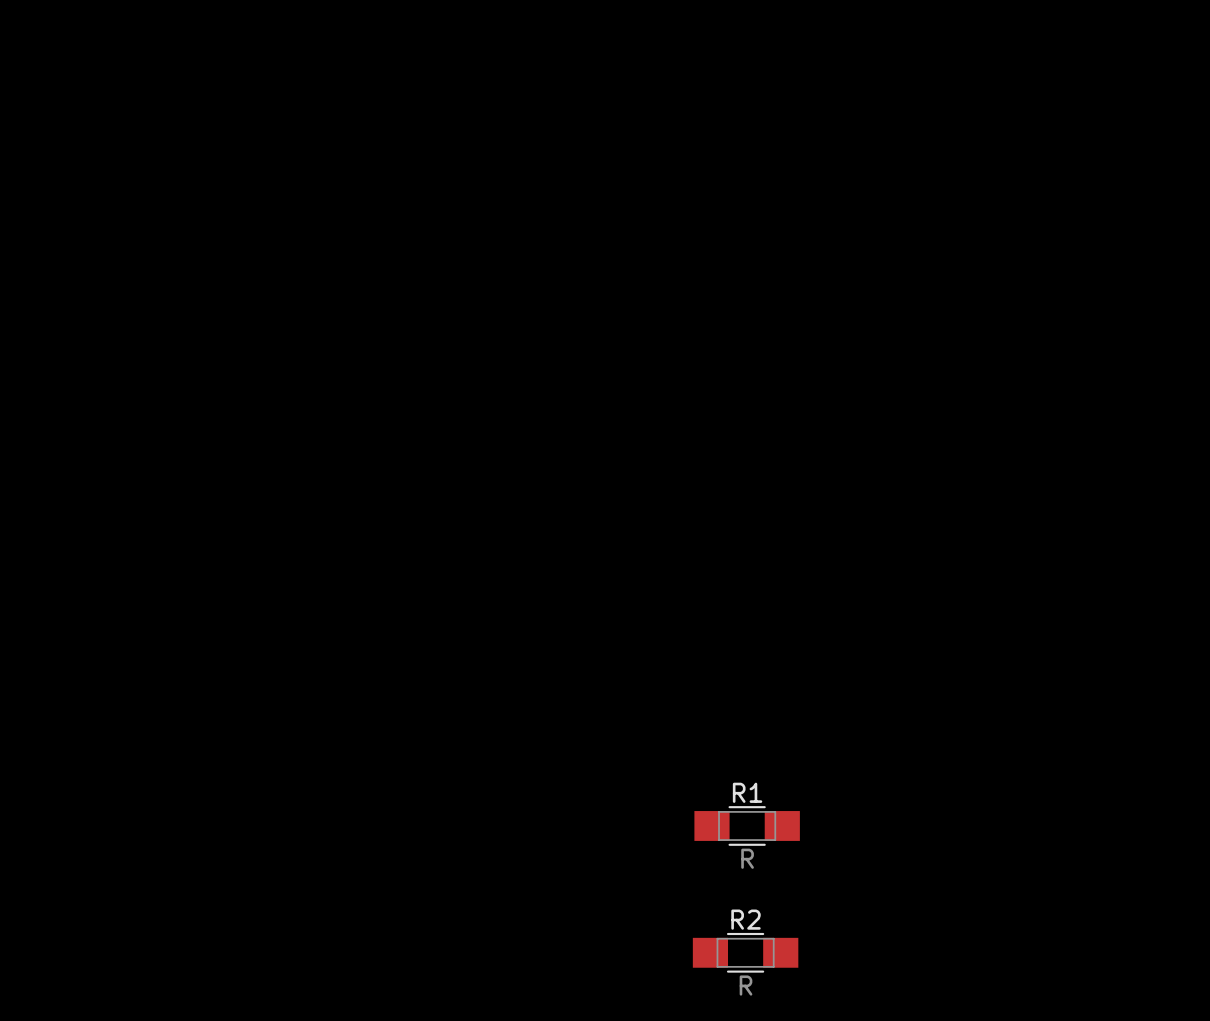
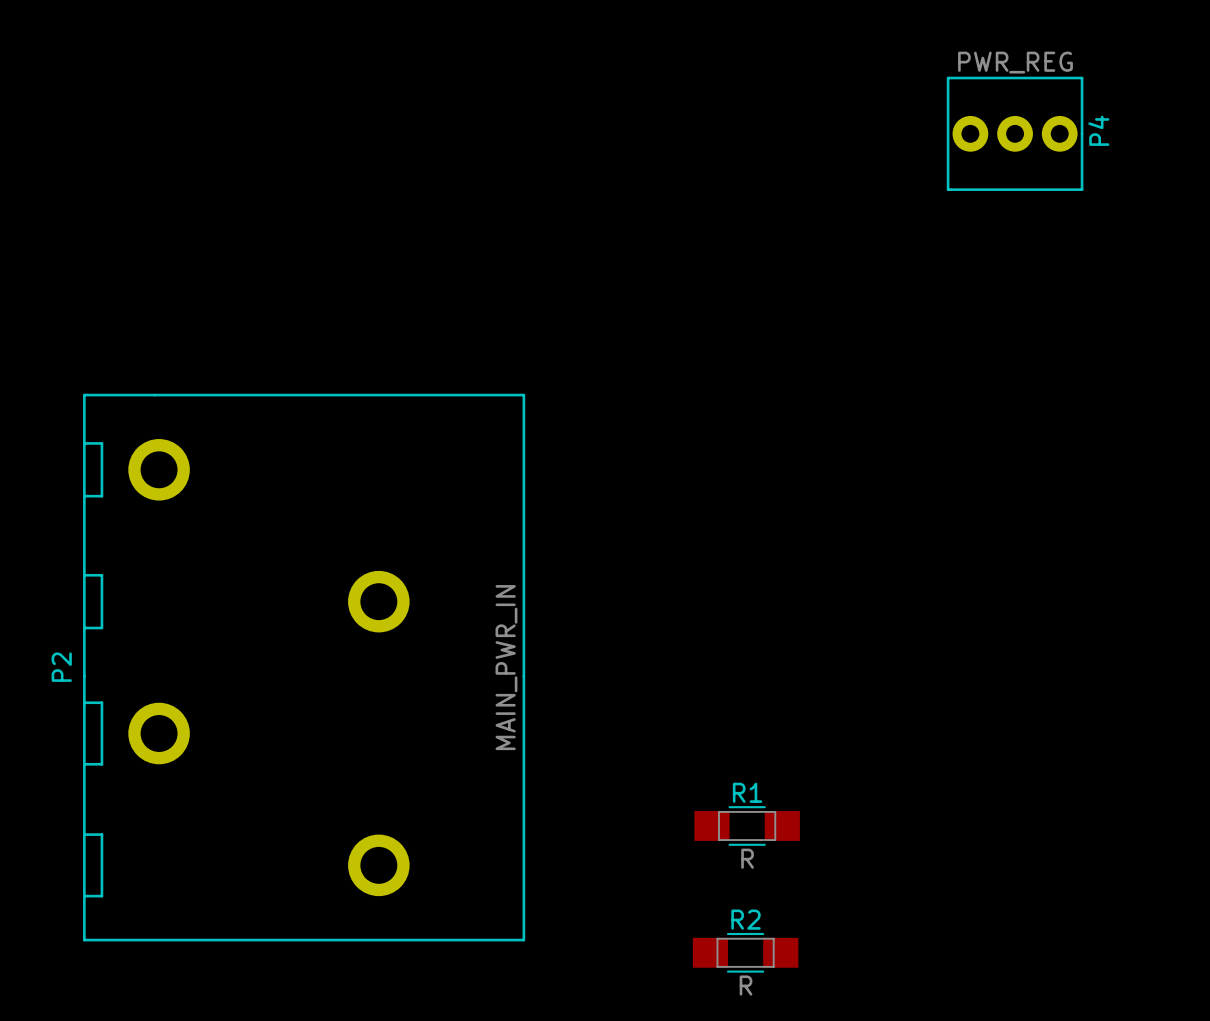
P4: none -> PWR_REG (1015, 133)
P2: none -> MAIN_PWR_IN (304, 667)

